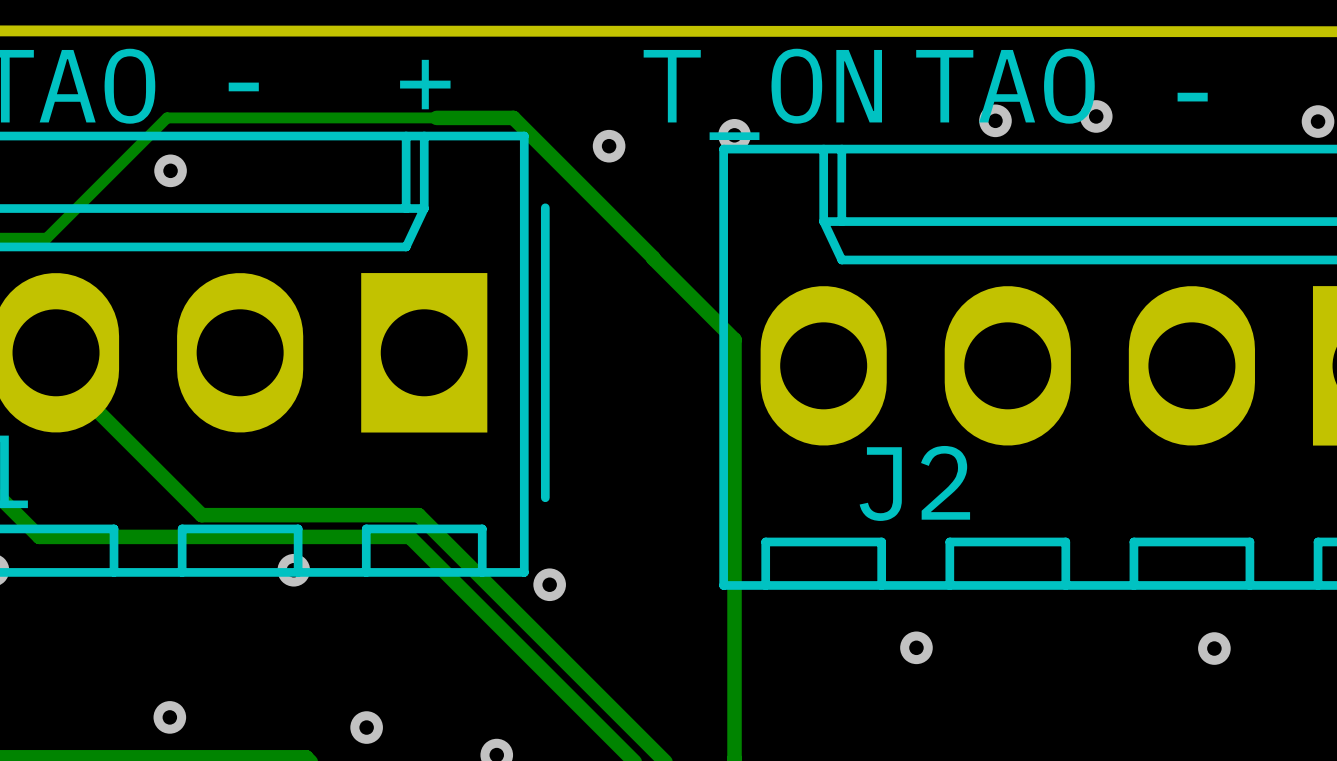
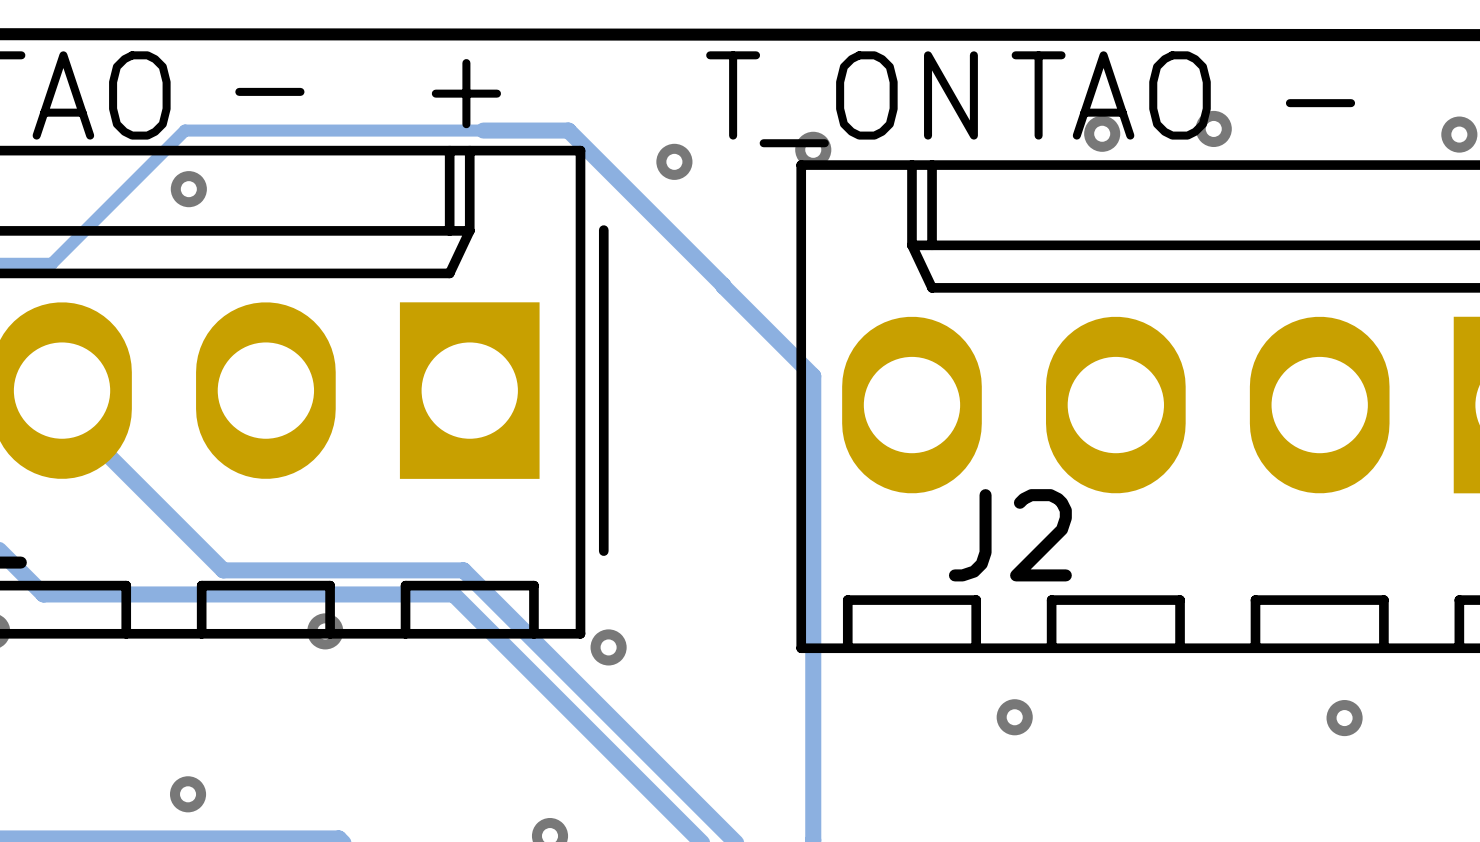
via: (366, 727) -> none

